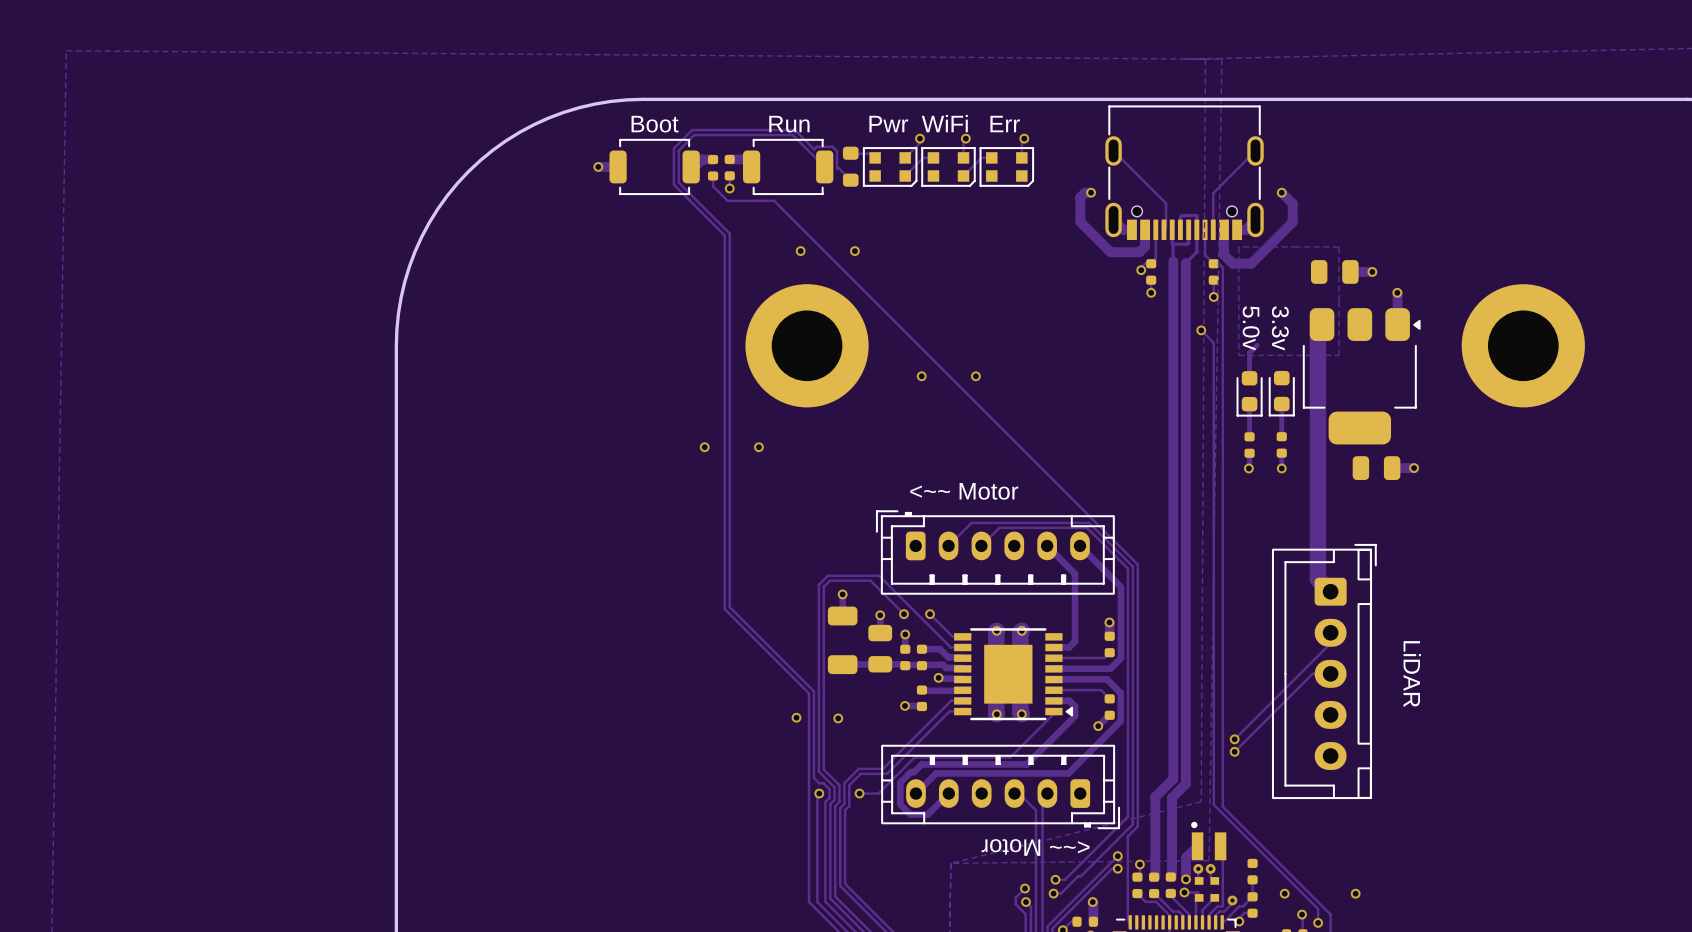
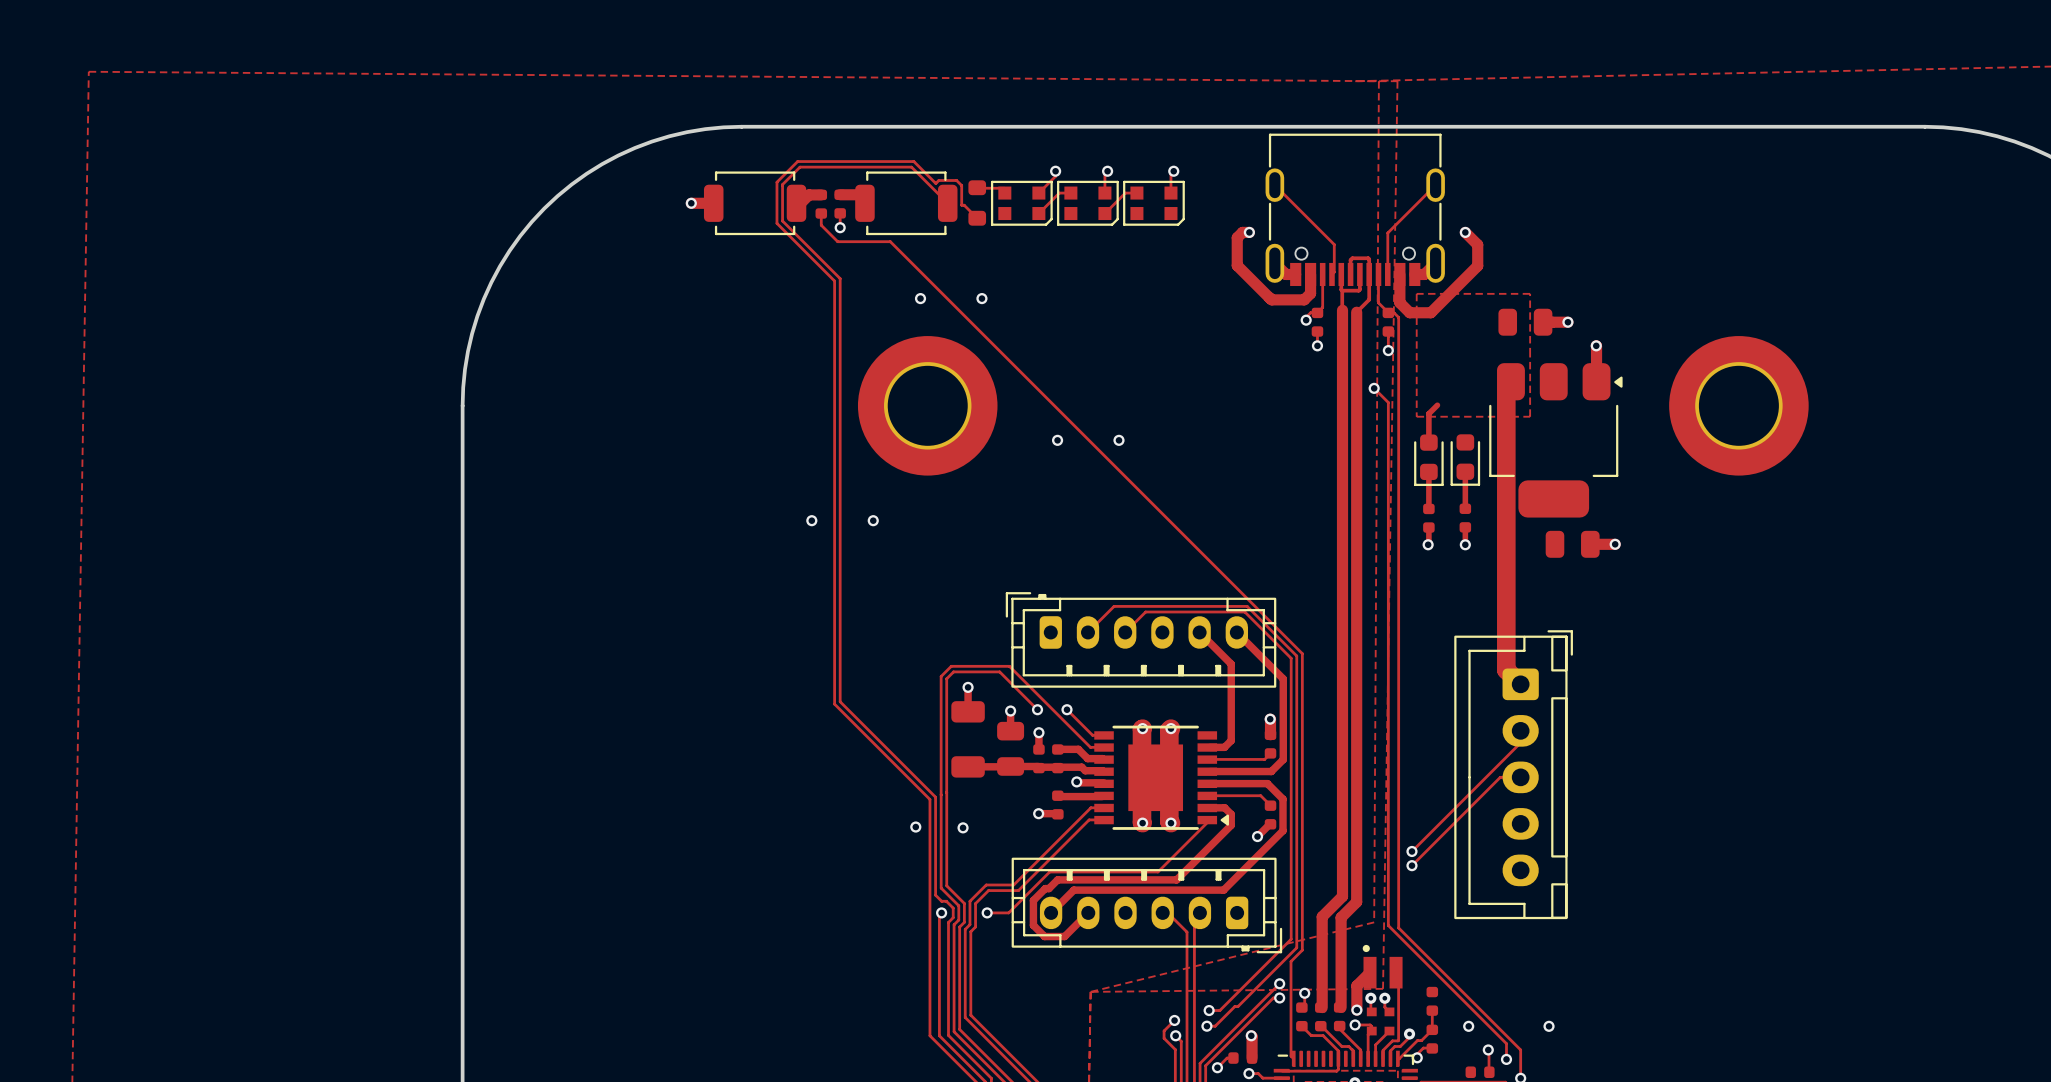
text: WiFi (944, 123) -> none
text: Boot (655, 124) -> none
text: Run (789, 124) -> none
text: Pwr (888, 124) -> none
text: Err (1005, 124) -> none
text: 5.0v (1251, 328) -> none
text: 3.3v (1280, 328) -> none
text: <~~ Motor (964, 491) -> none
text: LiDAR (1412, 674) -> none
text: <~~ Motor (1035, 847) -> none

